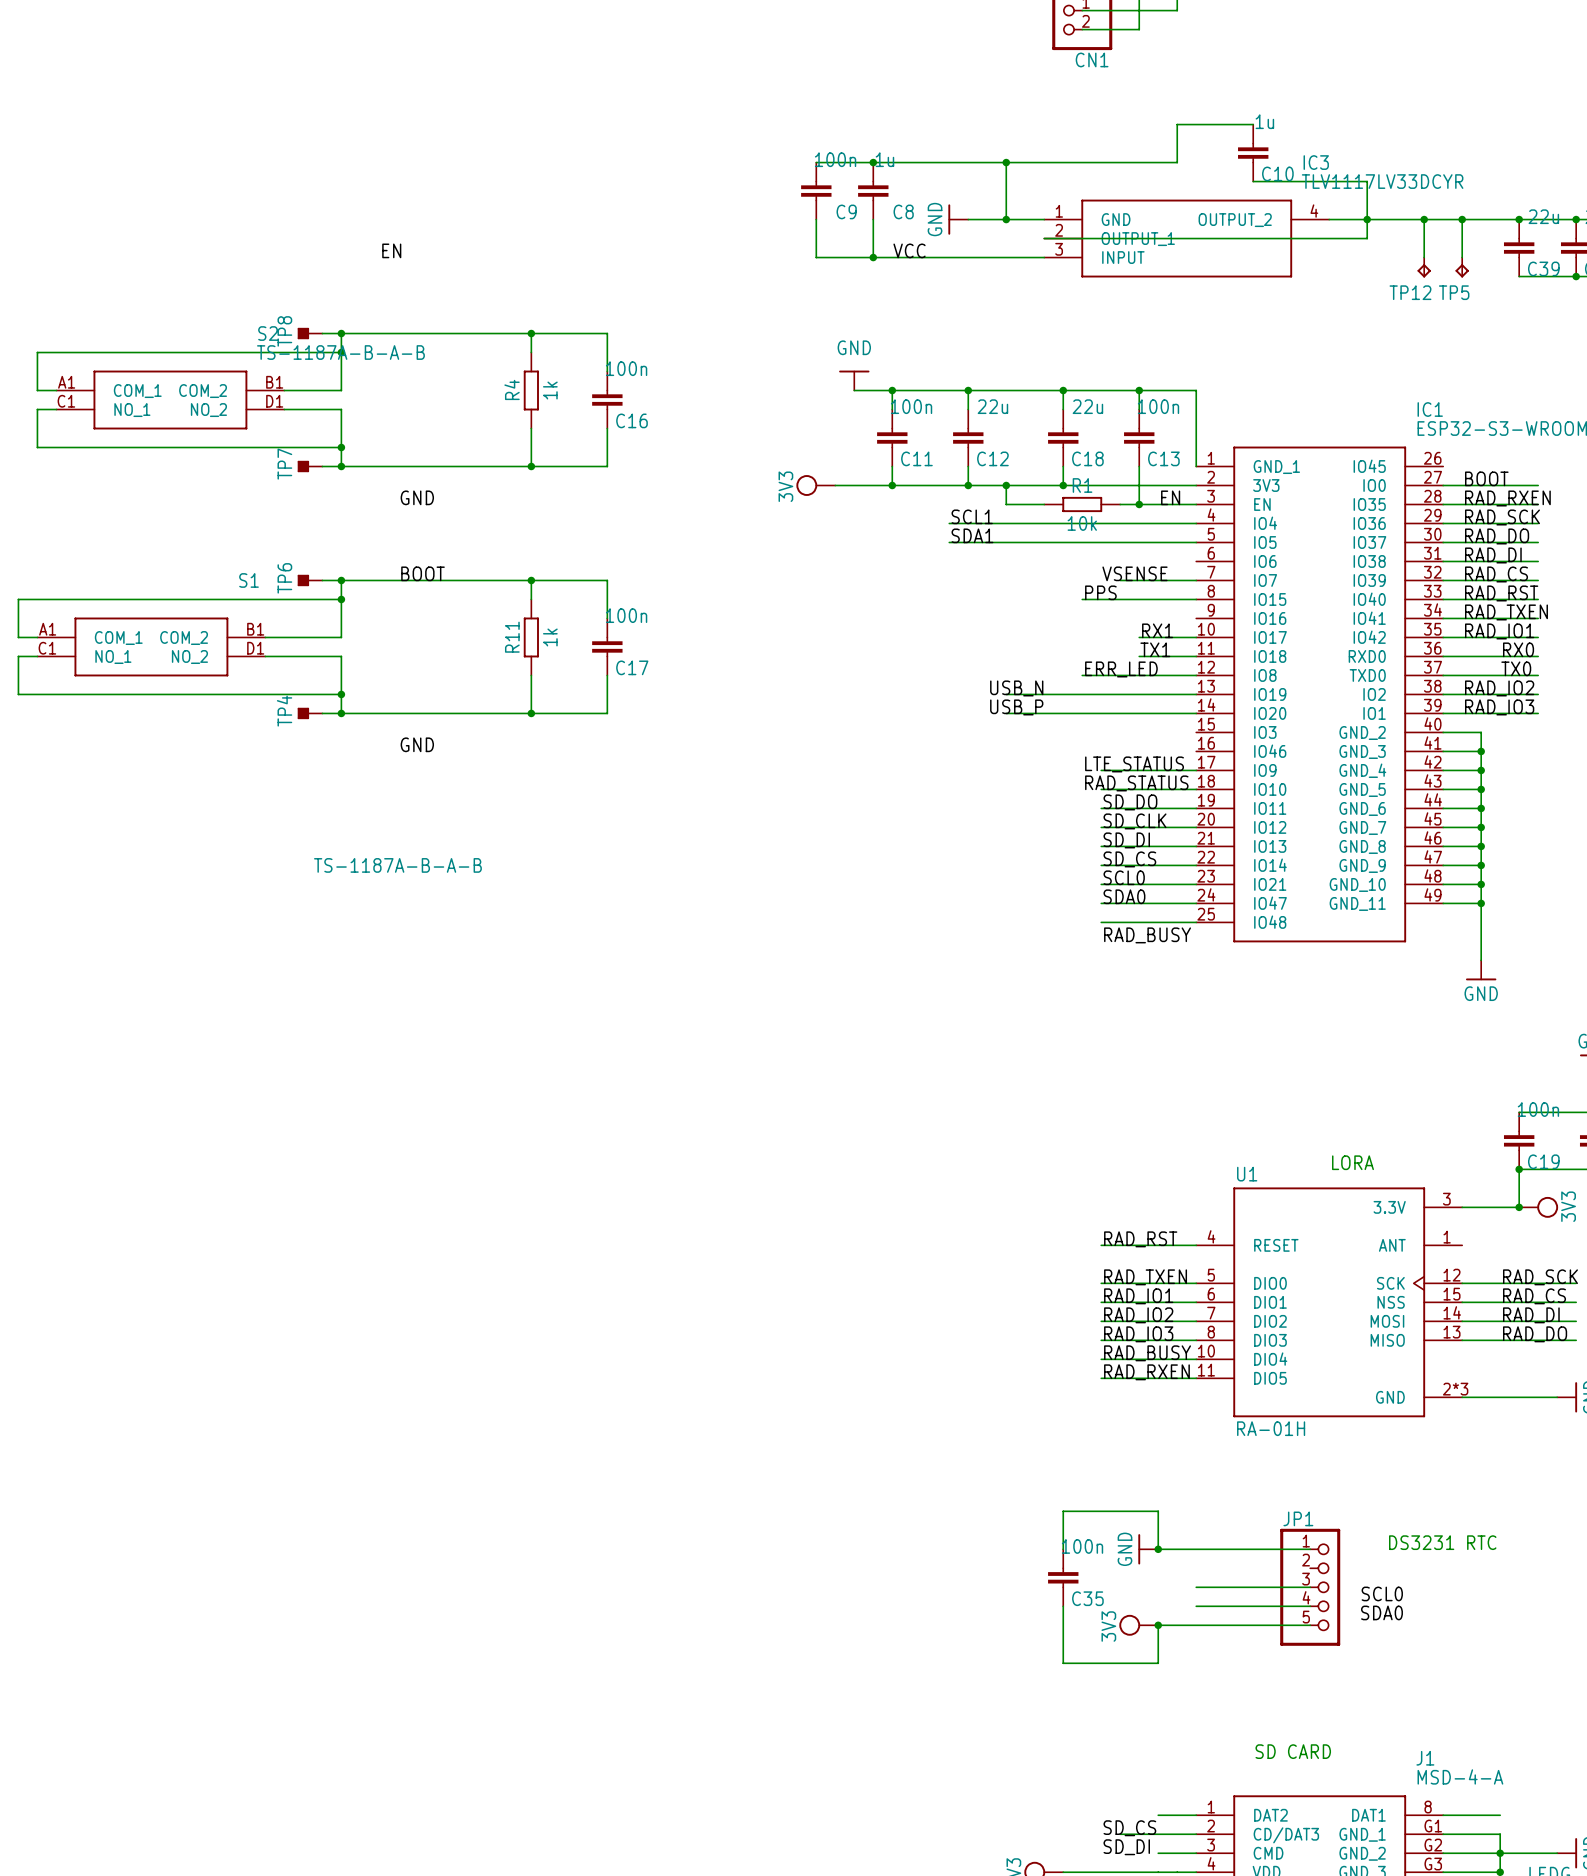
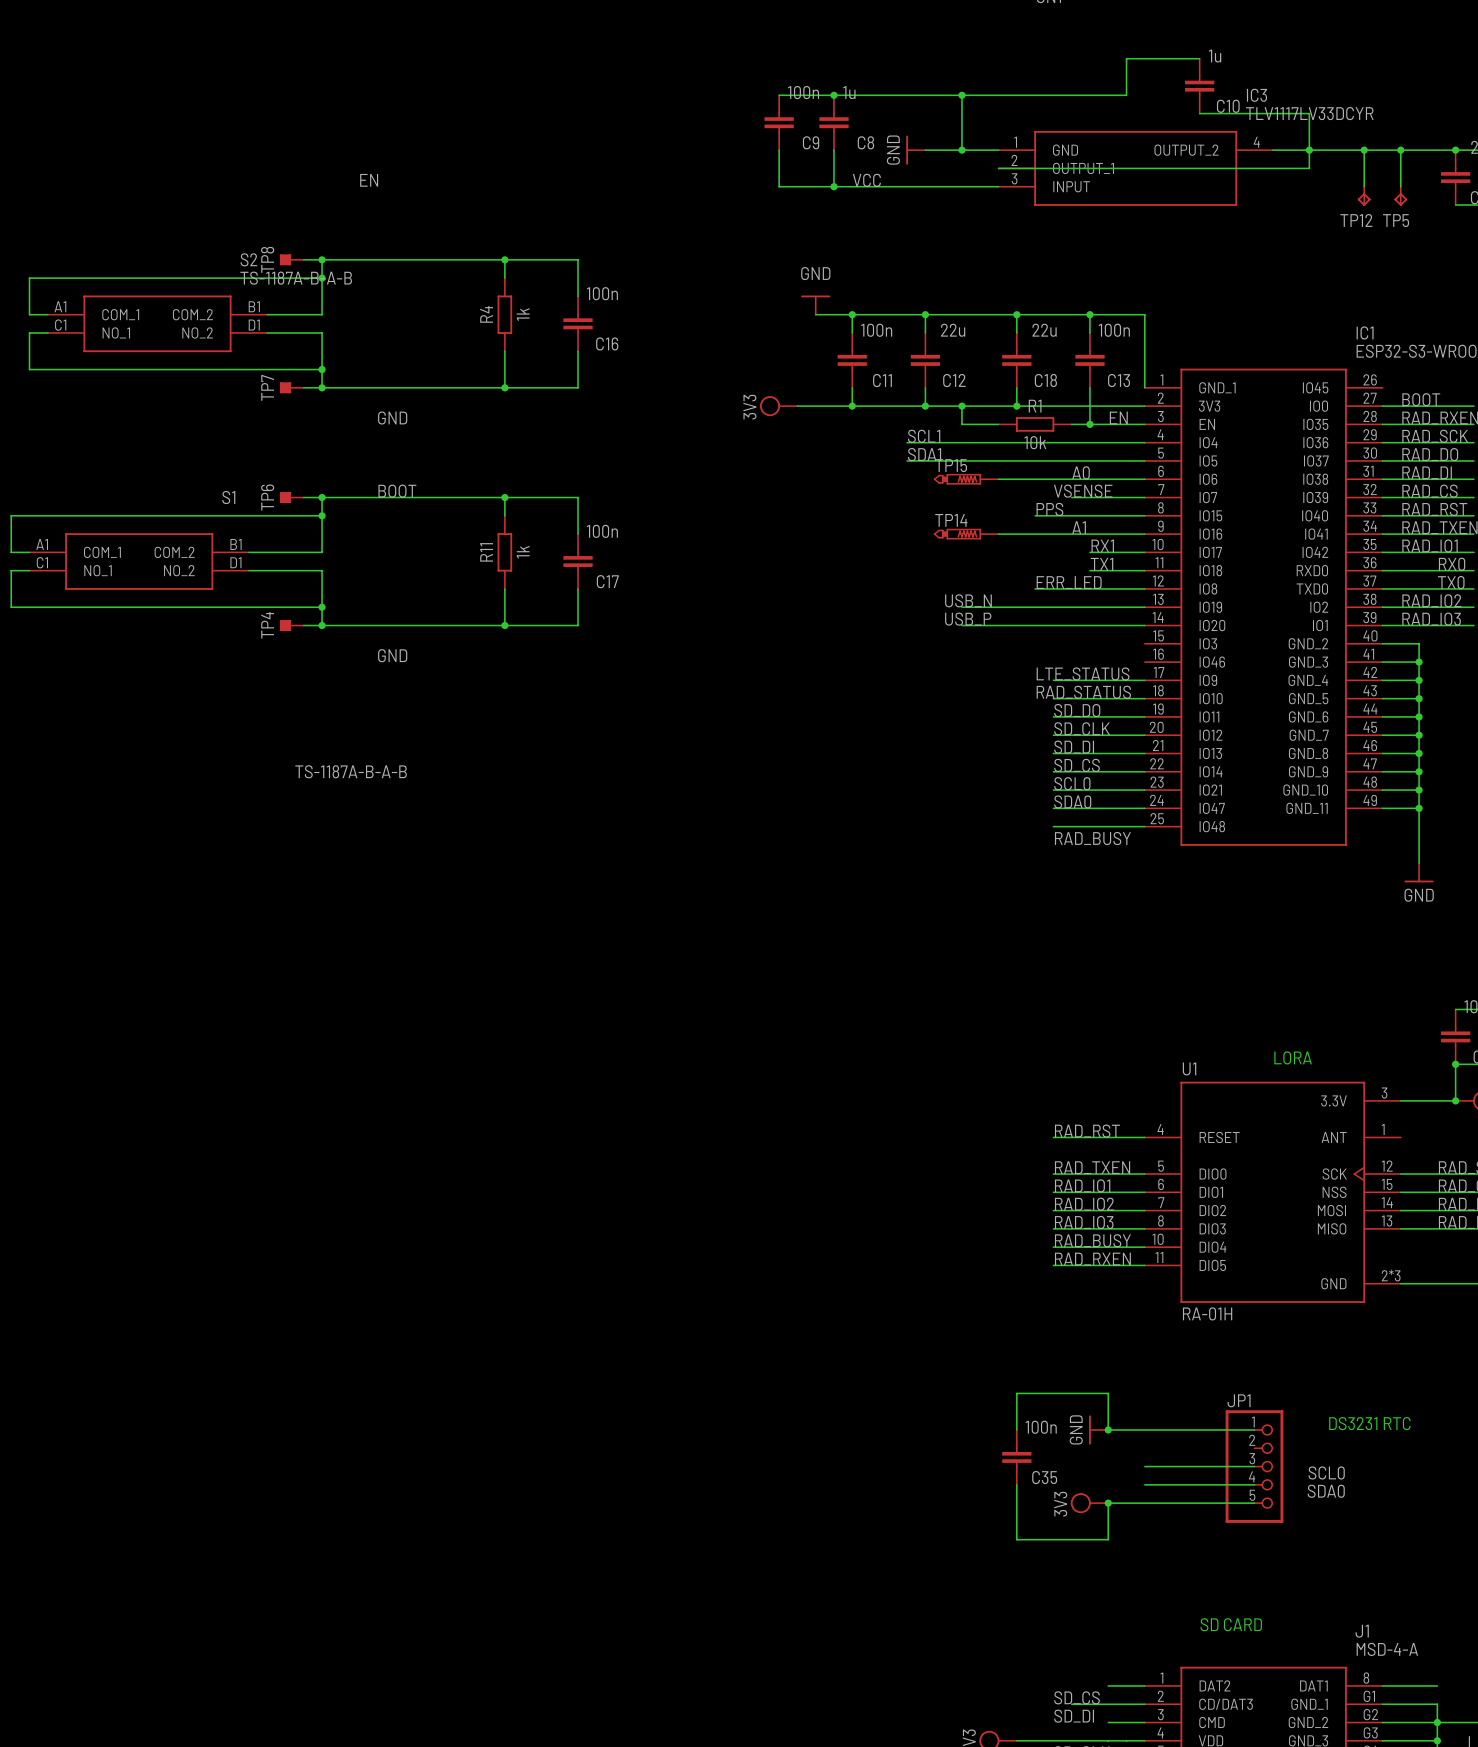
label: none -> A0 (1081, 472)
TP15: none -> (966, 479)
wire: none -> (998, 479) (1144, 479)
label: none -> A1 (1079, 527)
TP14: none -> (966, 534)
wire: none -> (998, 534) (1144, 534)

